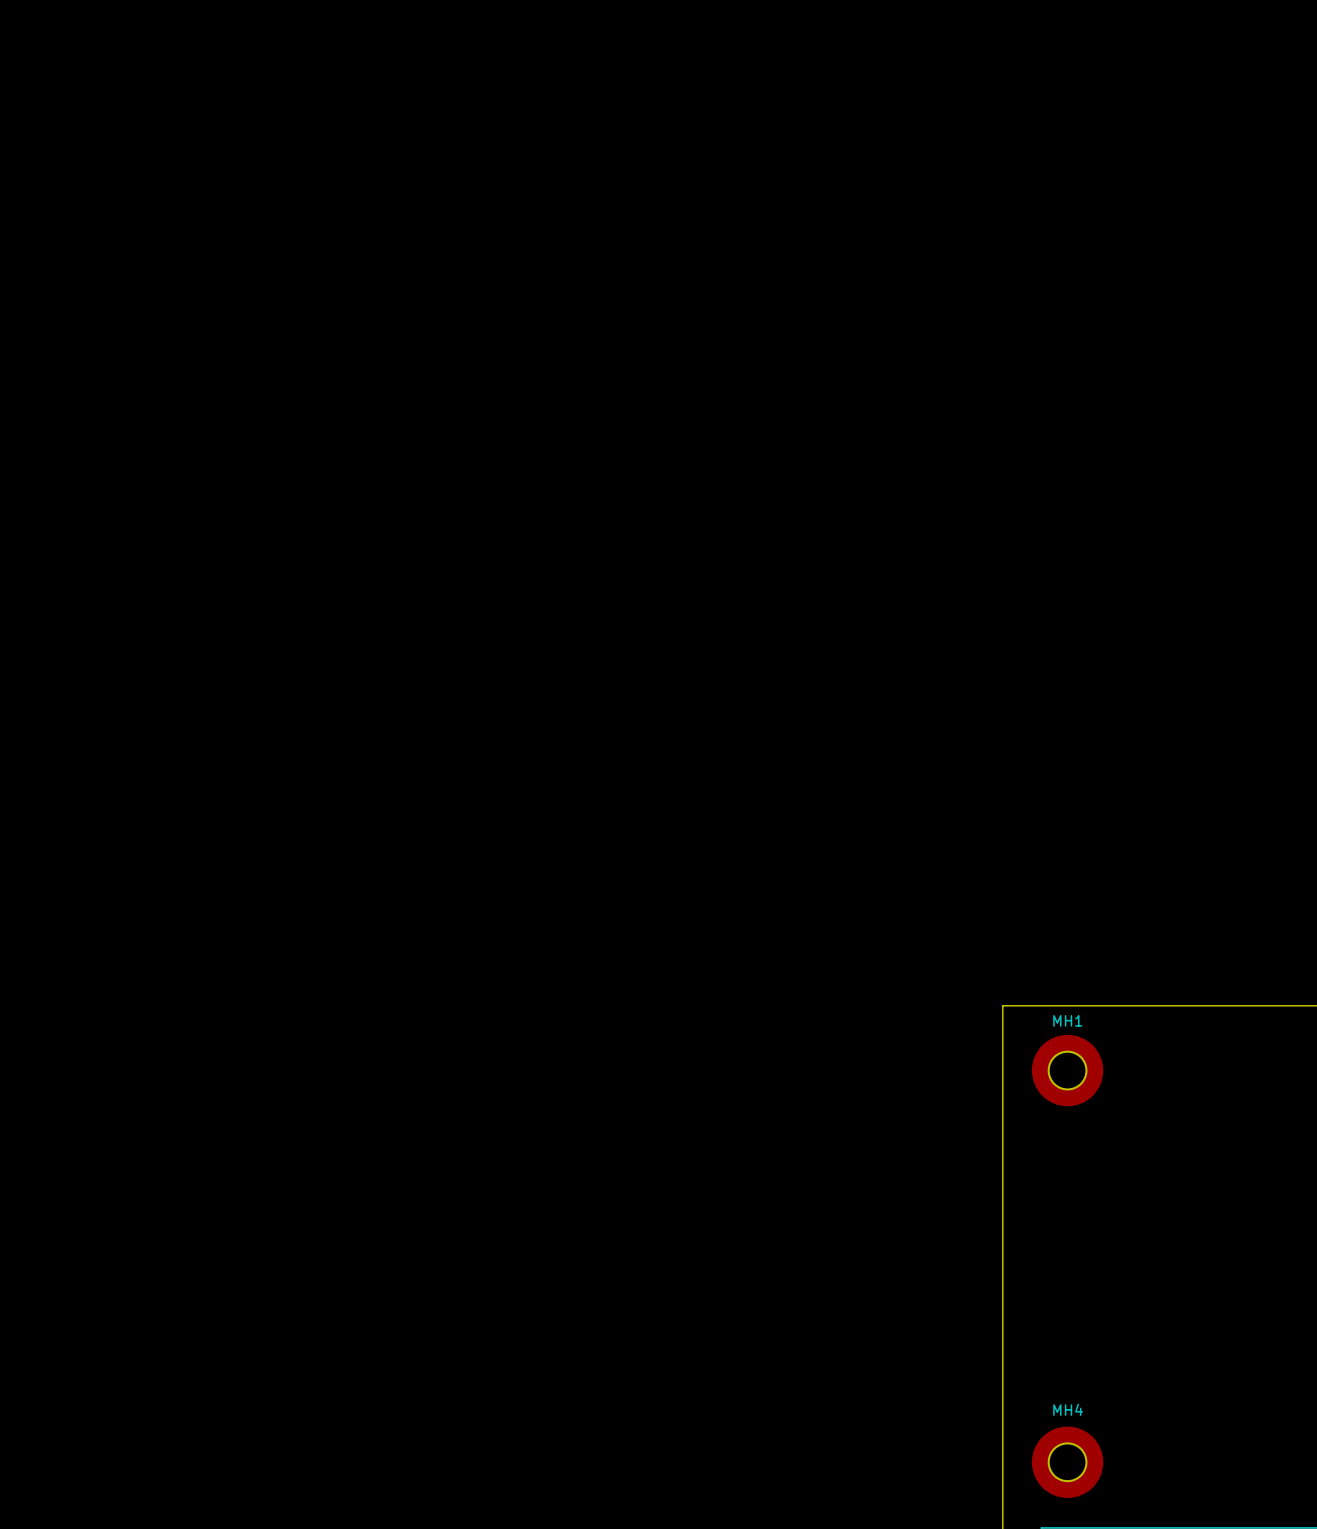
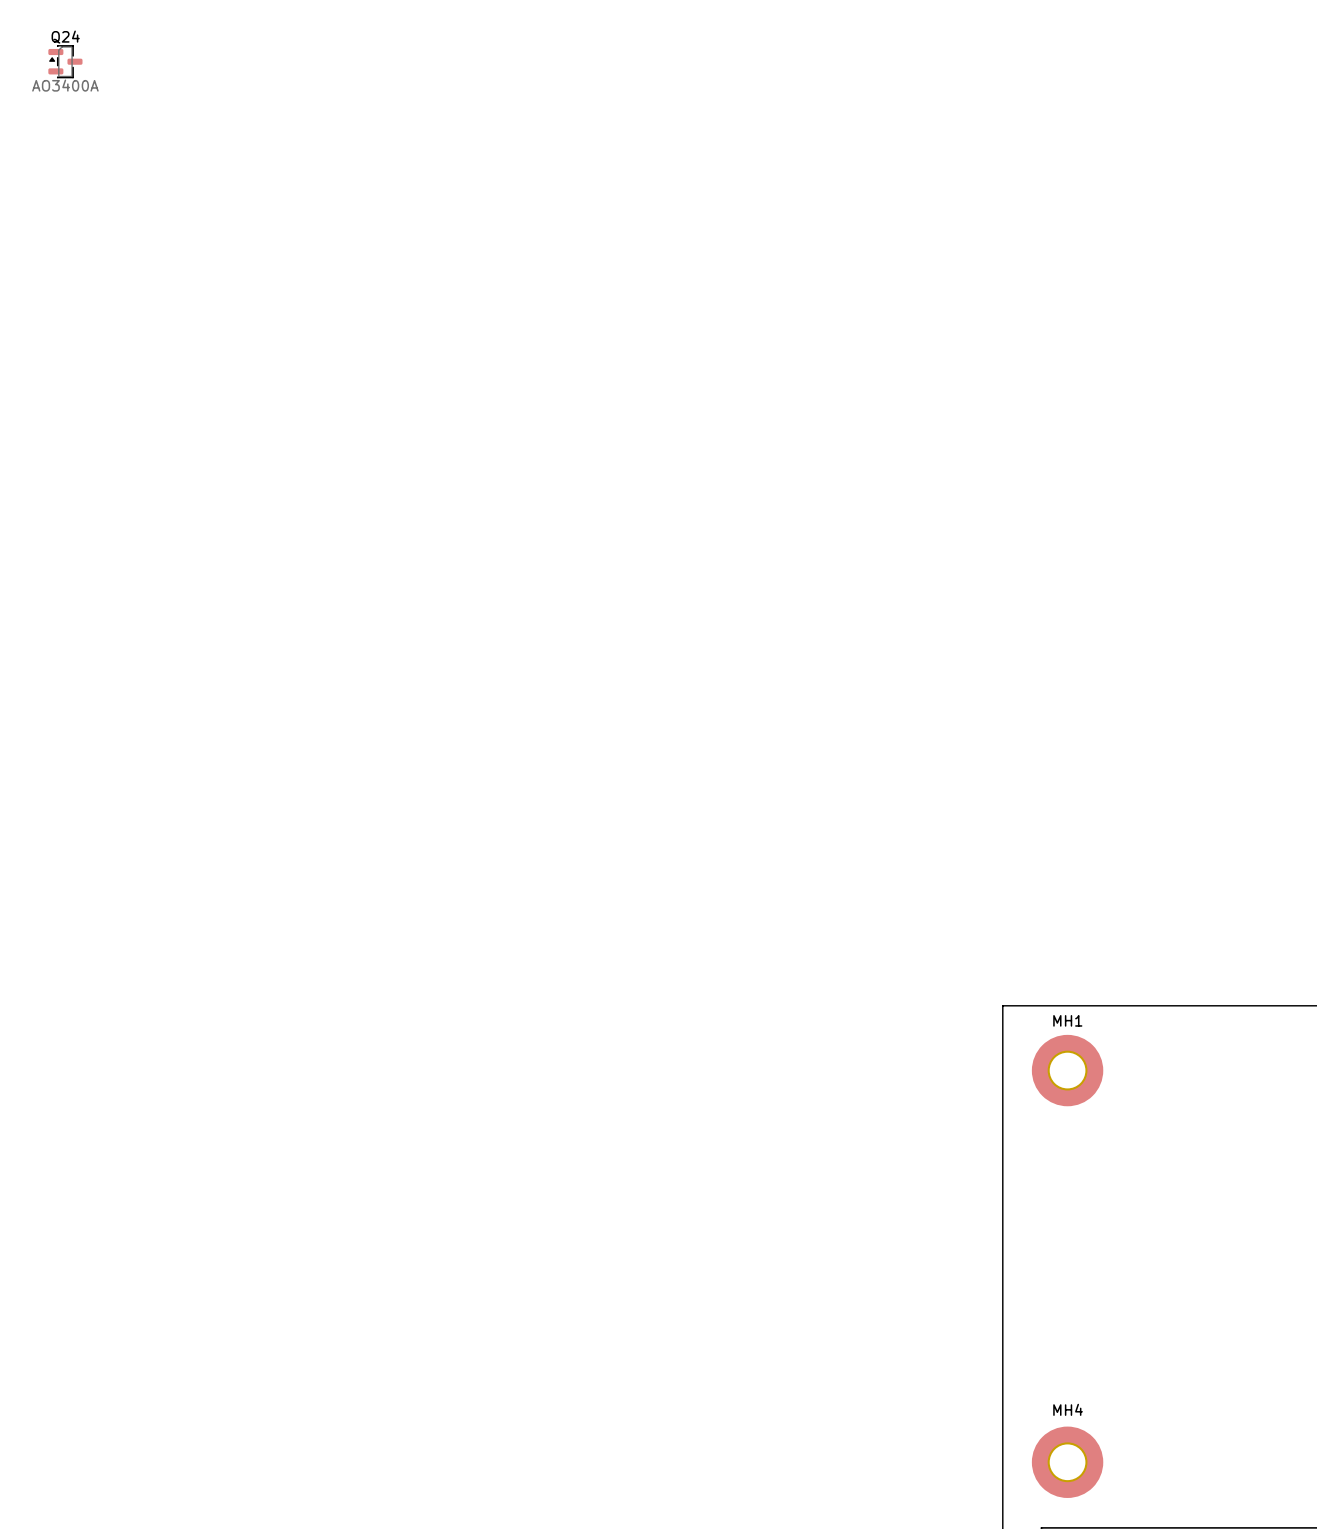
Q24: none -> AO3400A (65, 61)

